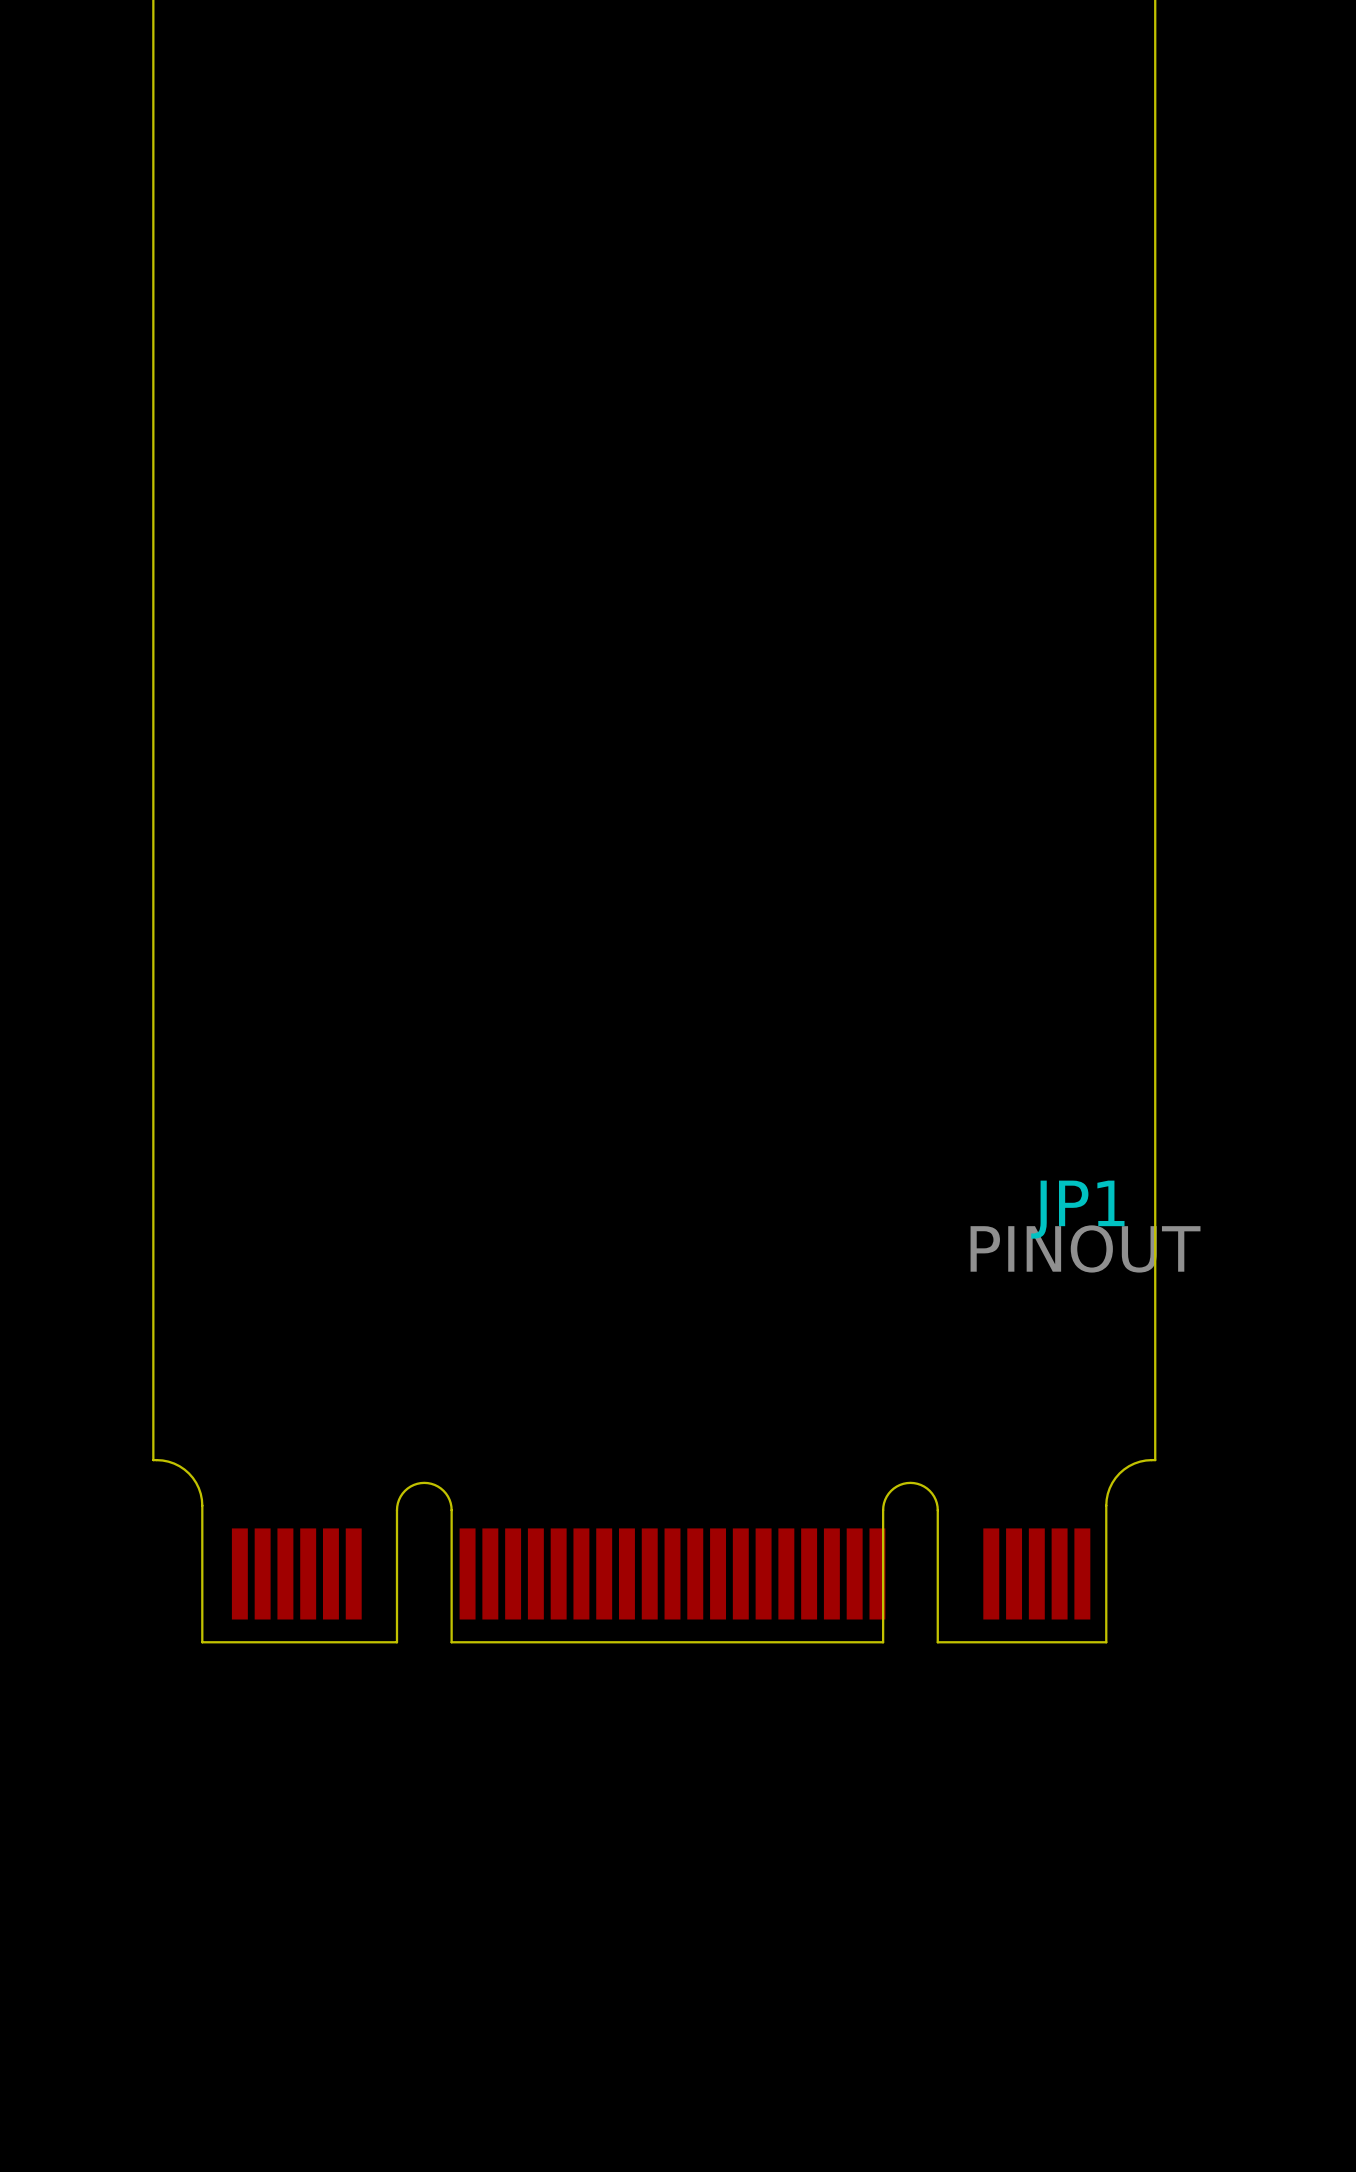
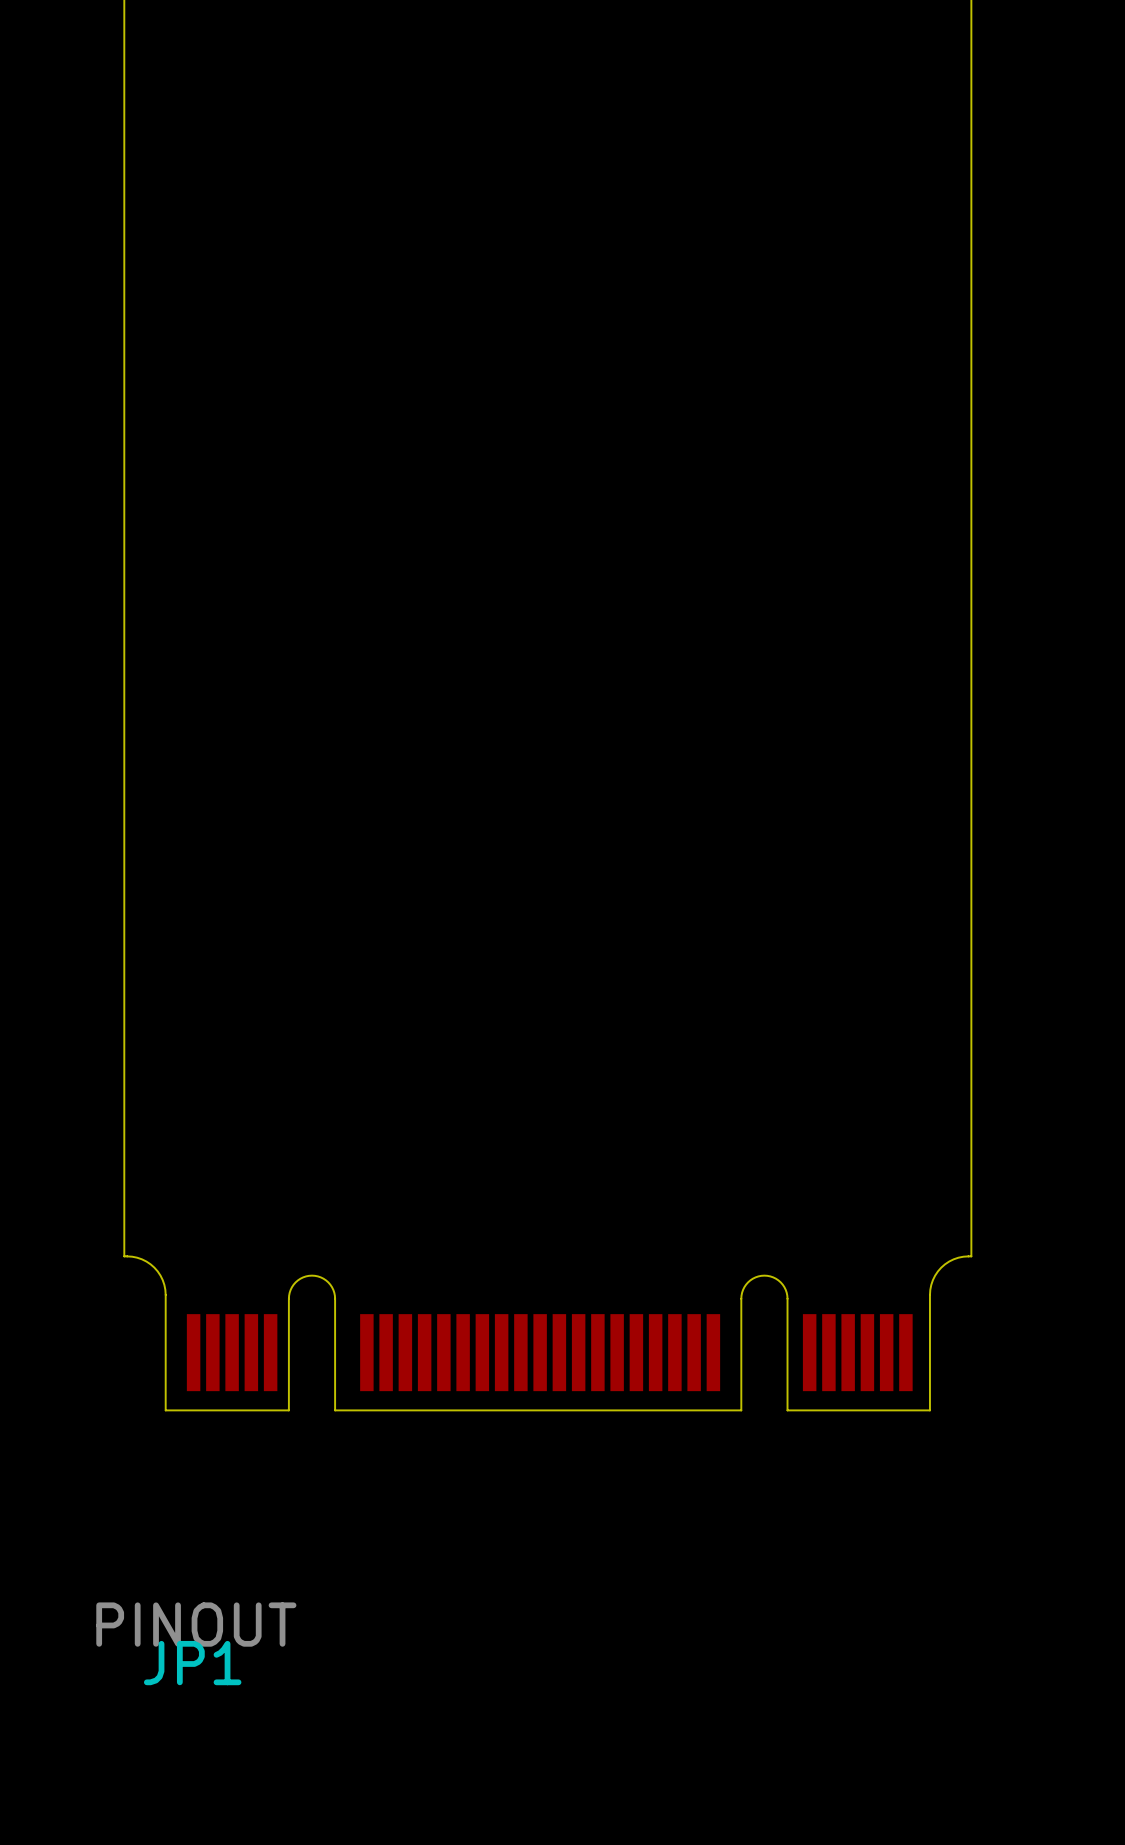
JP1 rotation: 0° (661, 1573) -> 180° (549, 1352)
board edge: (348, 1642) (396, 1642) (397, 1506) (400, 1496) (407, 1488) (424, 1482) (440, 1488) (447, 1496) (451, 1506) (451, 1642) -> (288, 1410) (289, 1295) (295, 1282) (303, 1277) (312, 1275) (320, 1277) (328, 1282) (334, 1295) (335, 1410) (376, 1410)

